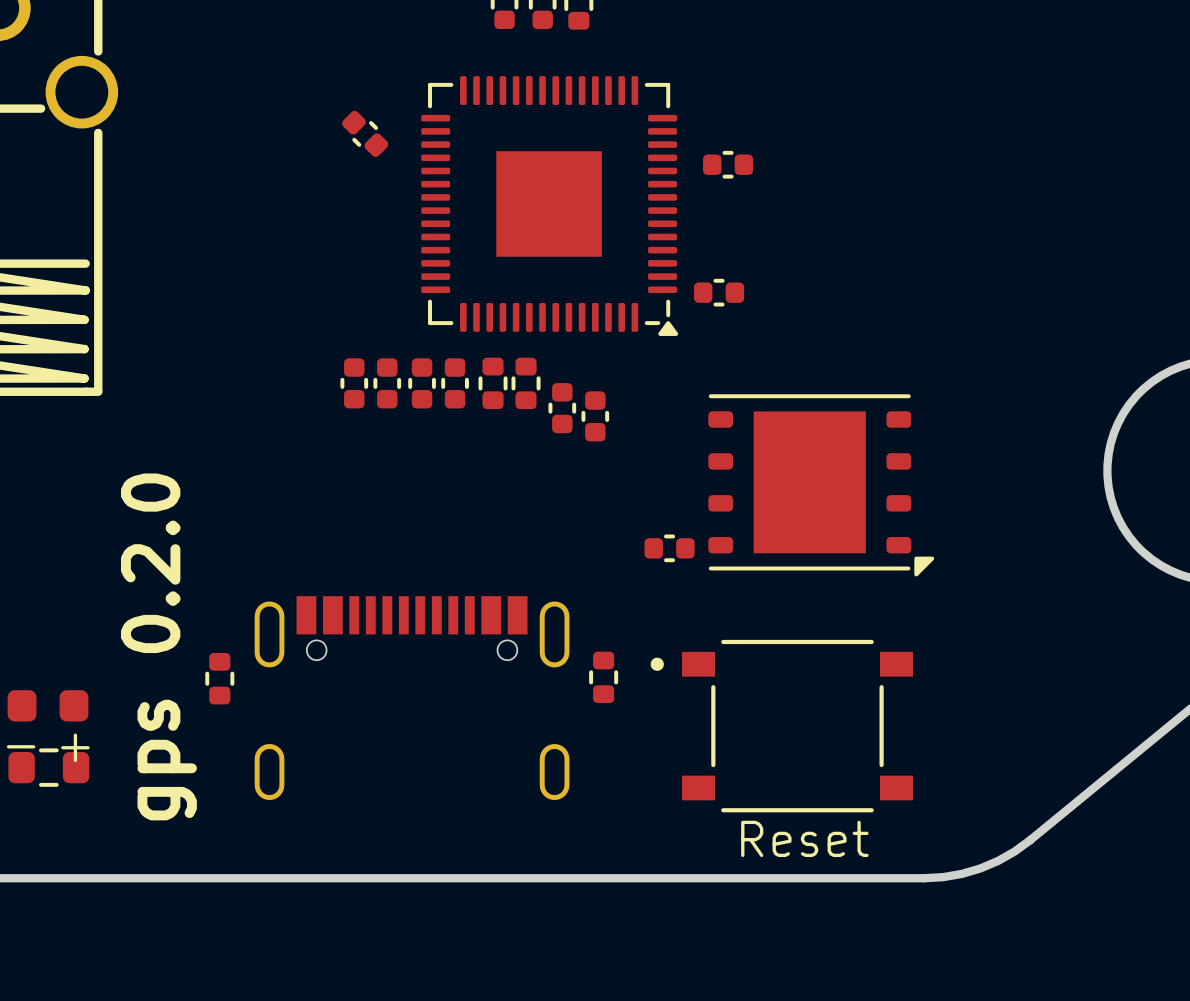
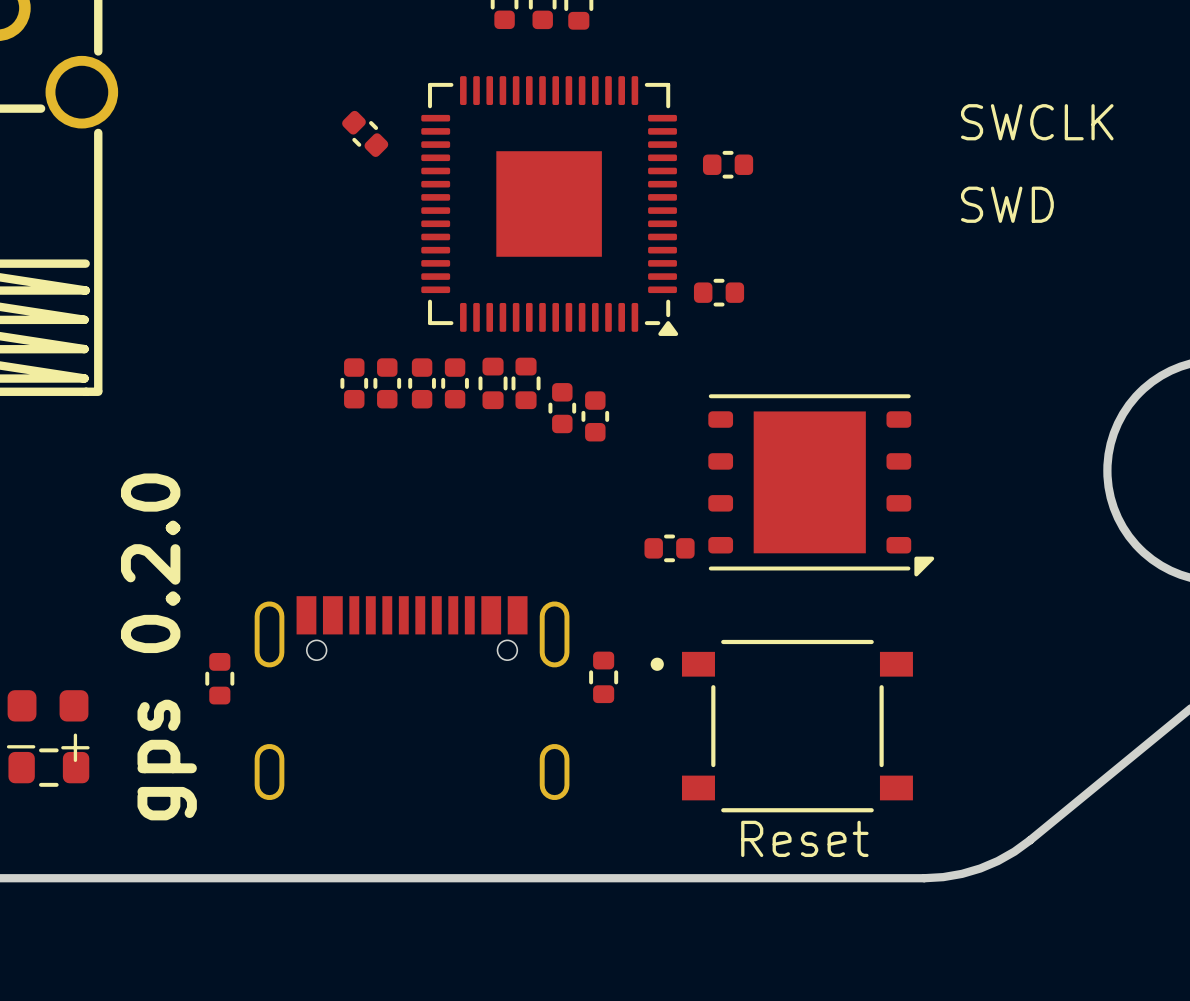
text: none -> SWCLK (1037, 122)
text: none -> SWD (1007, 204)

